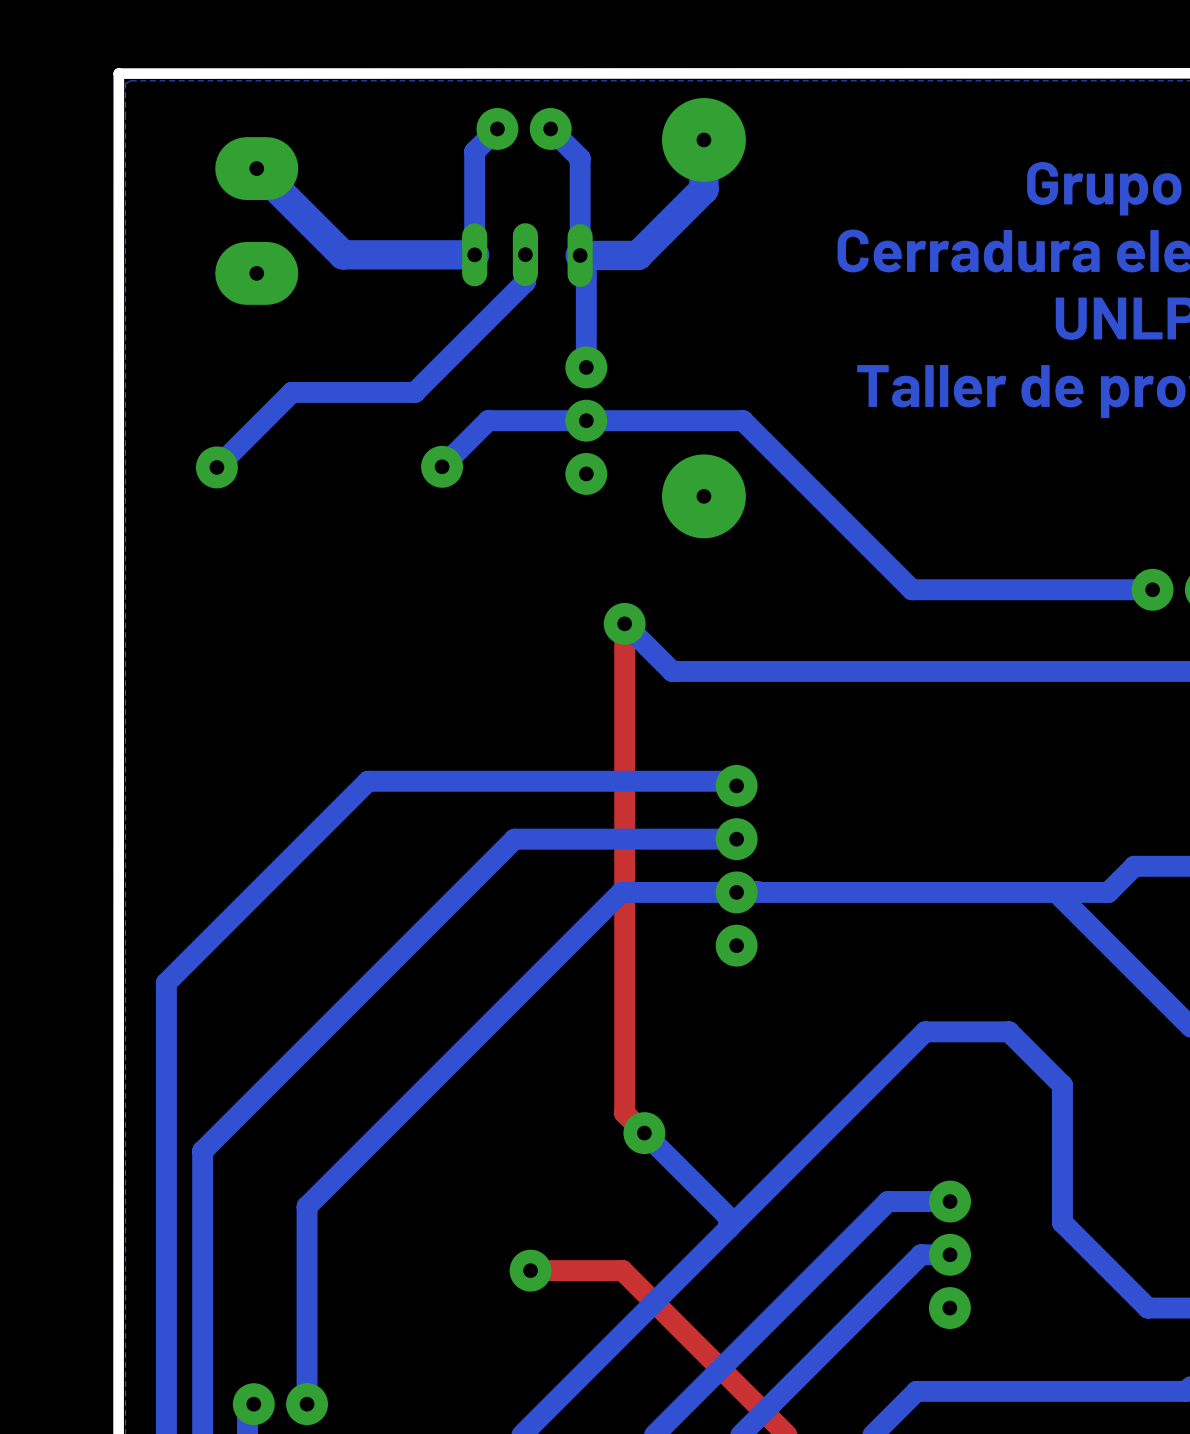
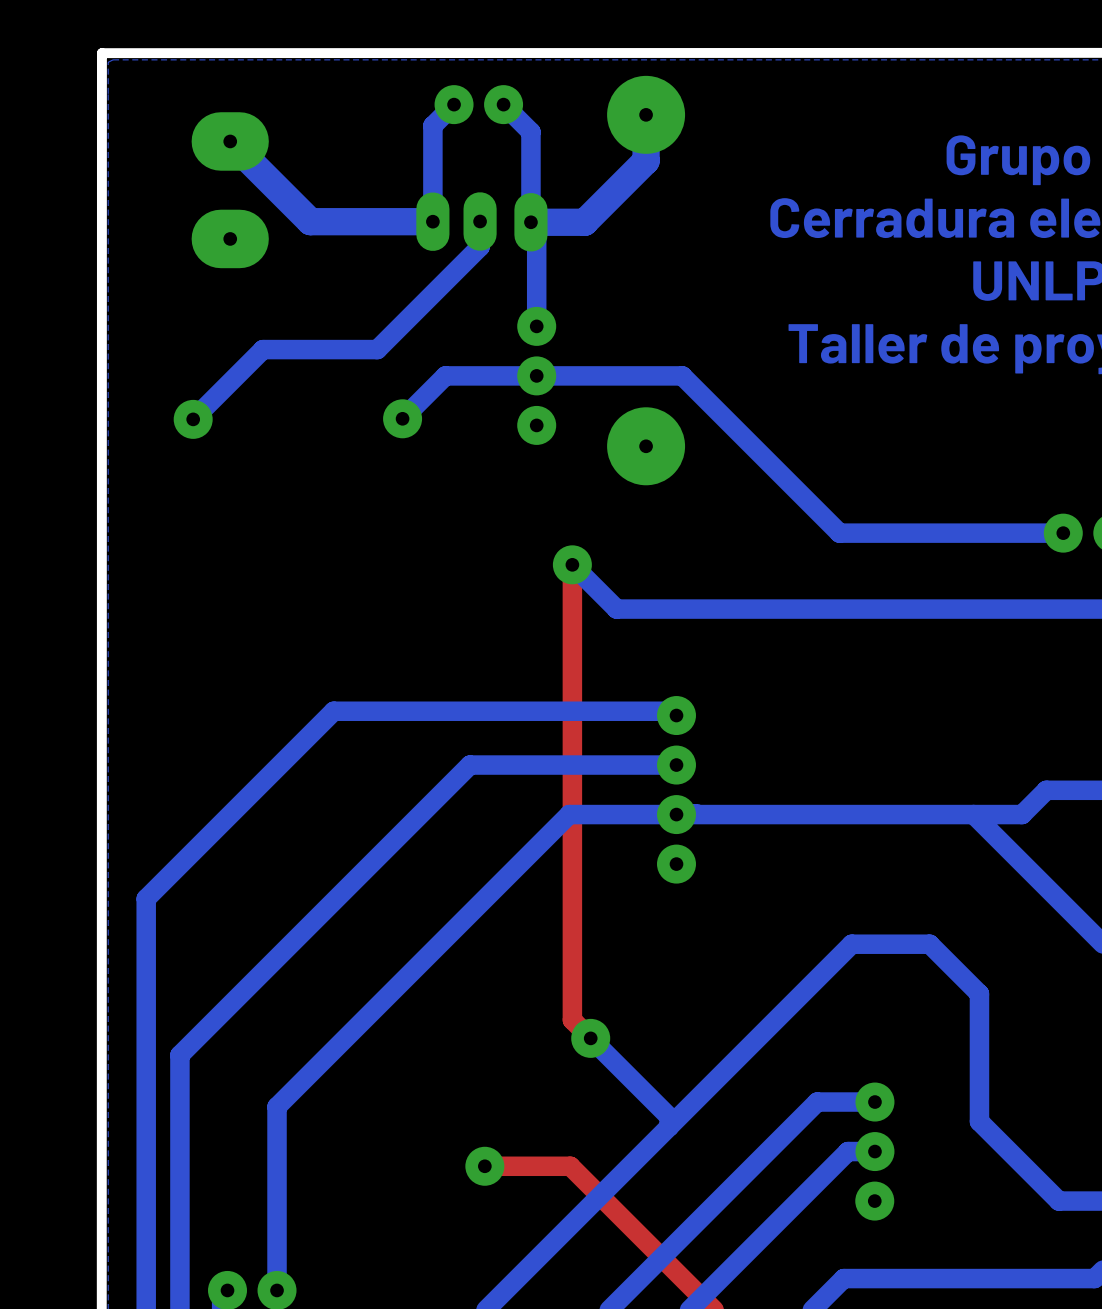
part footprint: [462, 223, 593, 287] -> [416, 192, 548, 252]

